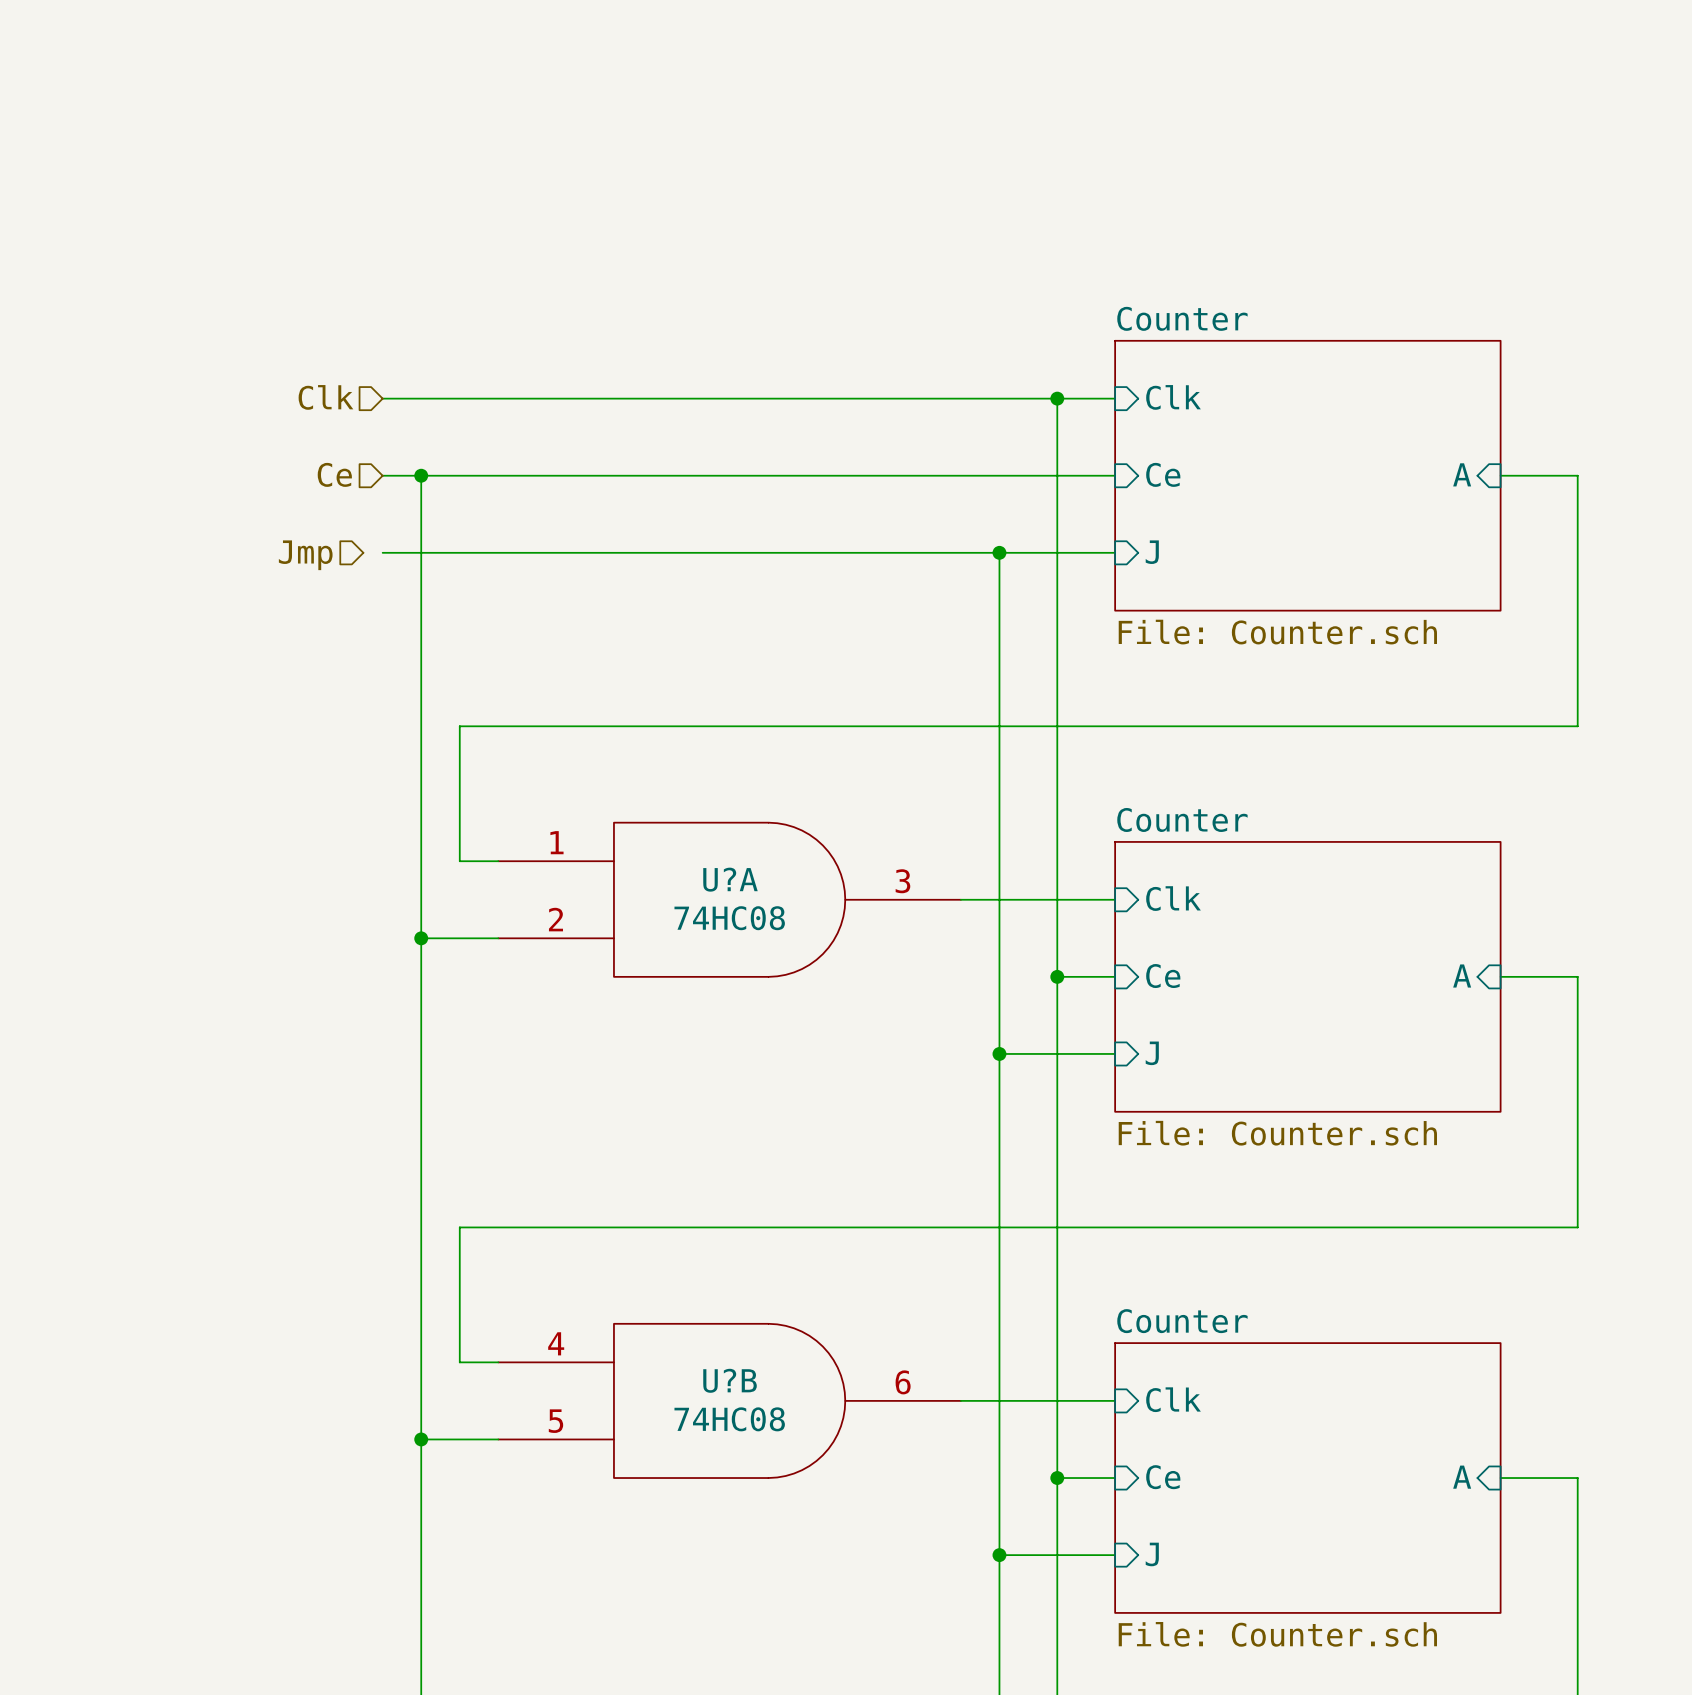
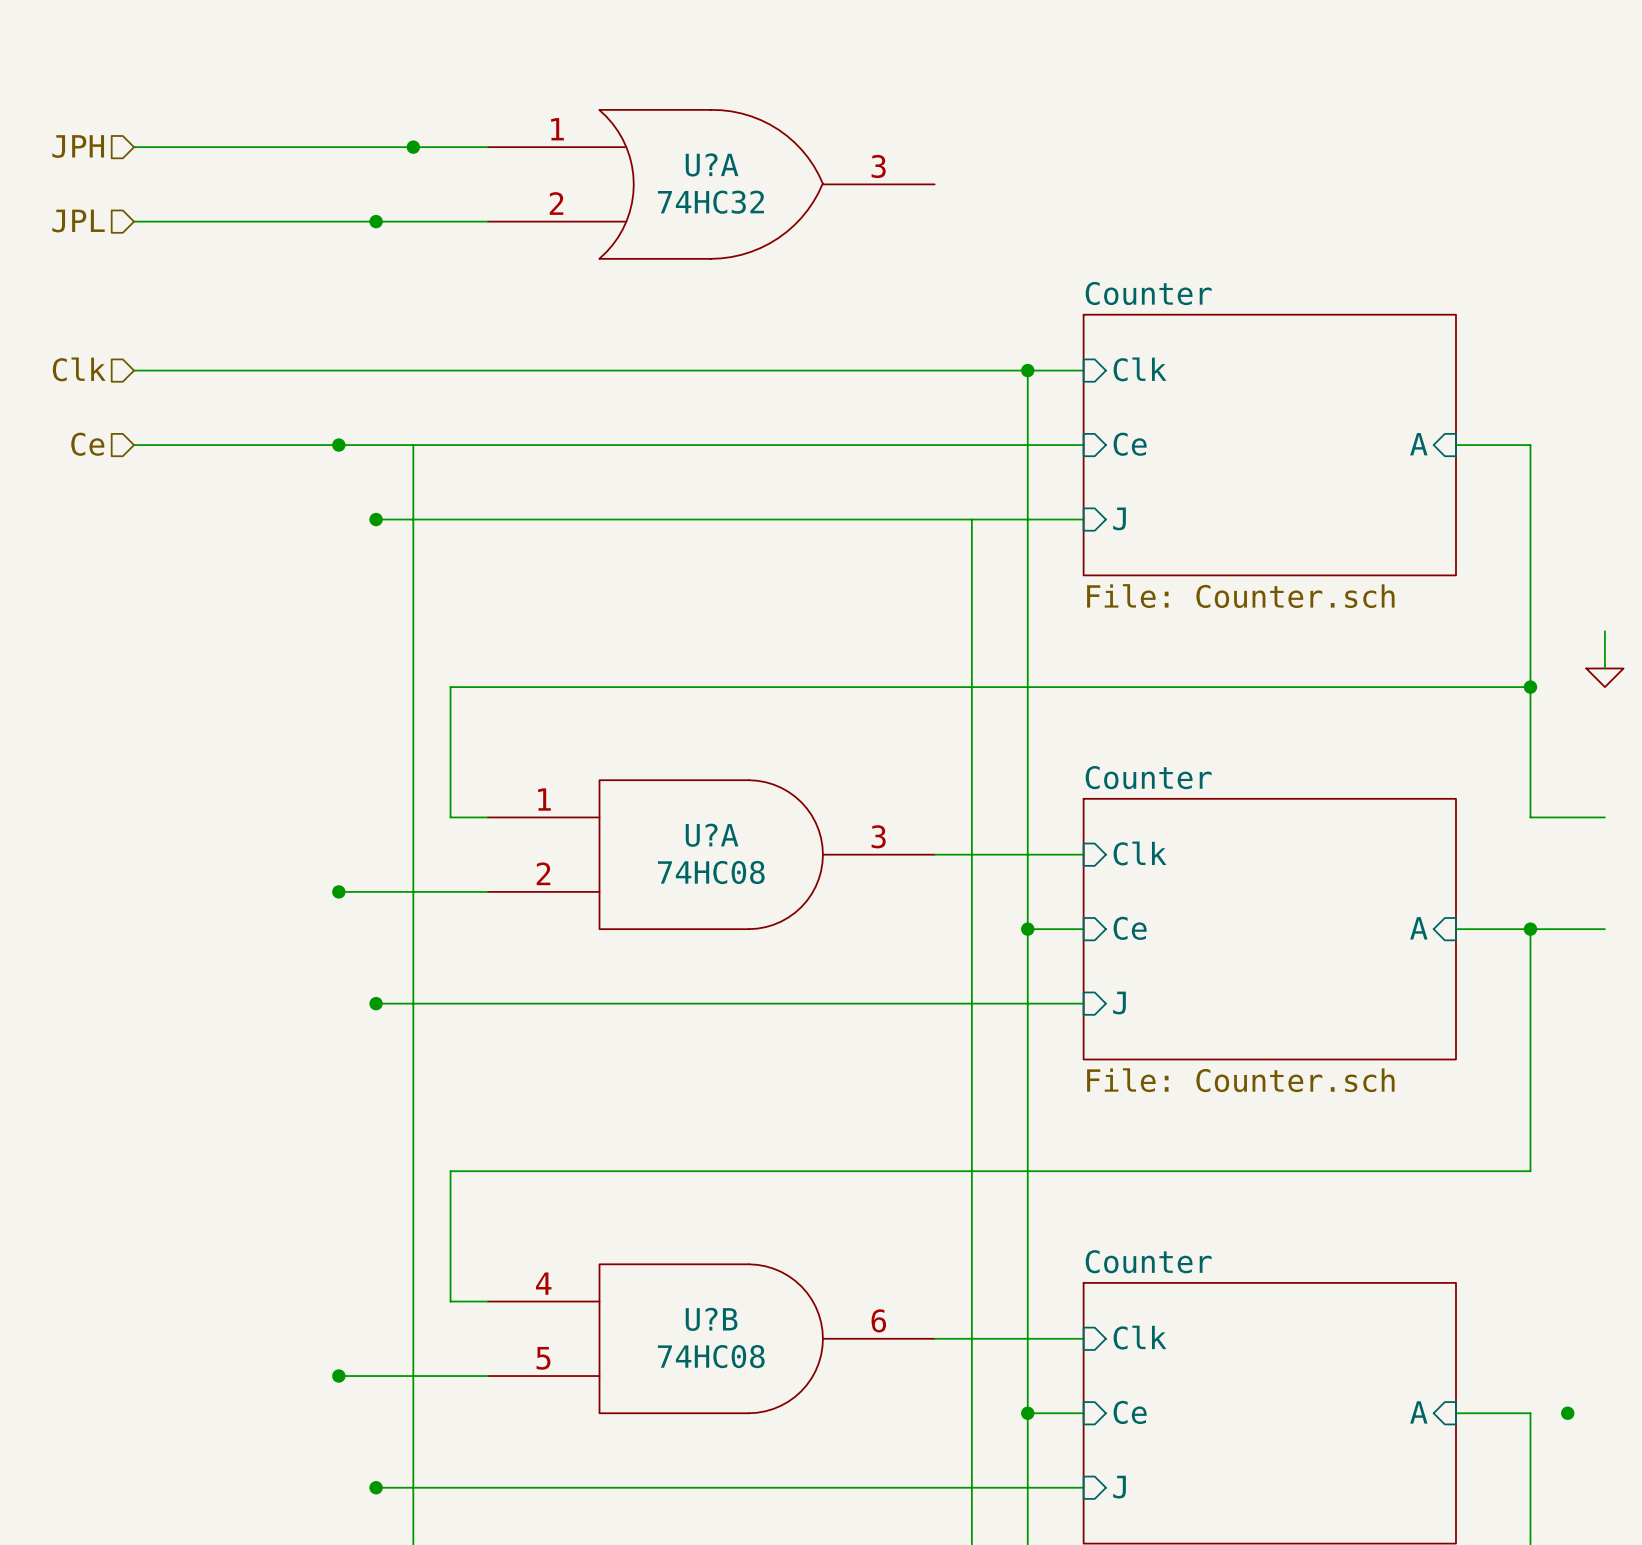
hierarchical label: none -> JPH (78, 146)
wire: none -> (134, 147) (487, 147)
junction: none -> (413, 147)
U?A: none -> 74HC32 (711, 184)
hierarchical label: none -> JPL (78, 221)
wire: none -> (134, 221) (487, 221)
junction: none -> (376, 221)
hierarchical label position: Clk (325, 397) -> Clk (79, 369)
wire: none -> (134, 370) (376, 370)
hierarchical label position: Ce (334, 474) -> Ce (87, 444)
wire: none -> (134, 445) (376, 445)
junction: none -> (338, 445)
junction: (421, 475) -> none
junction: none -> (376, 519)
junction: (999, 552) -> none
hierarchical label: Jmp (305, 555) -> none
wire: none -> (1604, 631) (1604, 668)
power symbol: none -> (1604, 677)
wire: none -> (1530, 687) (1530, 817) (1604, 817)
junction: none -> (1530, 687)
wire: none -> (338, 891) (413, 891)
junction: none -> (338, 891)
junction: (421, 938) -> none
wire: none -> (1530, 929) (1604, 929)
junction: none -> (1530, 929)
wire: none -> (376, 1003) (971, 1003)
junction: none -> (376, 1003)
junction: (999, 1053) -> none
wire: none -> (338, 1376) (413, 1376)
junction: none -> (338, 1376)
junction: (421, 1439) -> none
junction: none -> (1567, 1413)
wire: none -> (376, 1487) (971, 1487)
junction: none -> (376, 1487)
junction: (999, 1555) -> none

